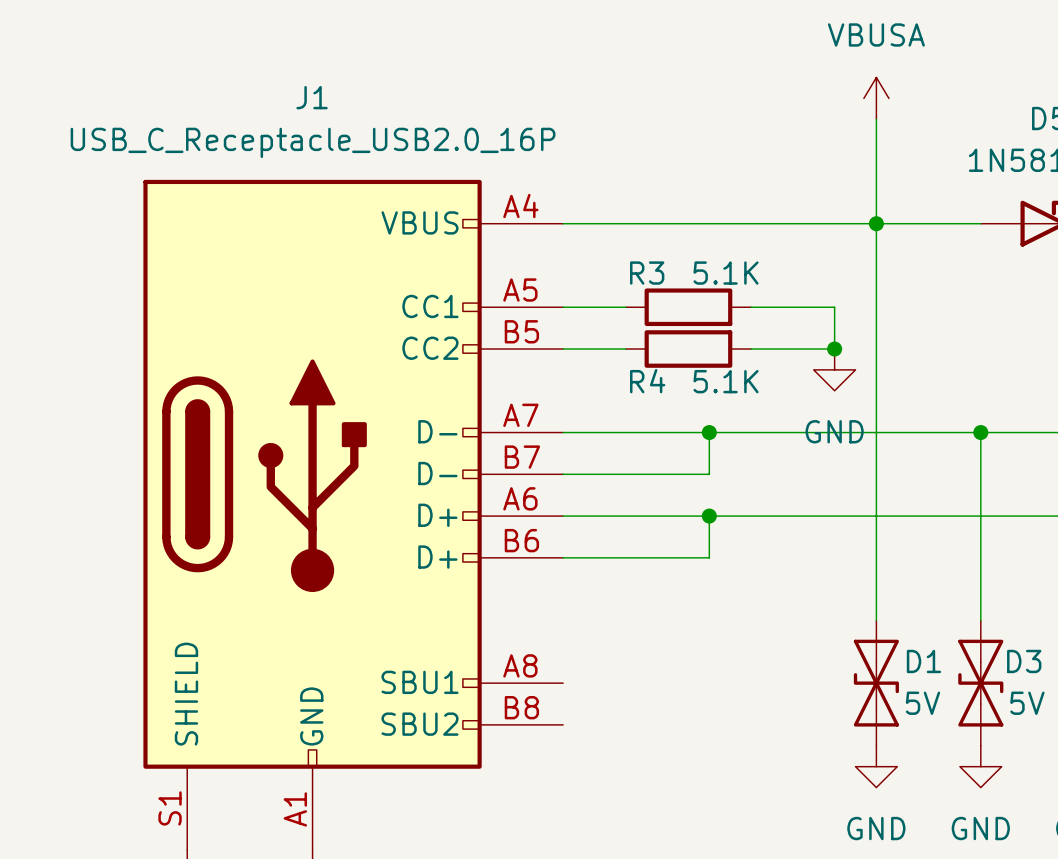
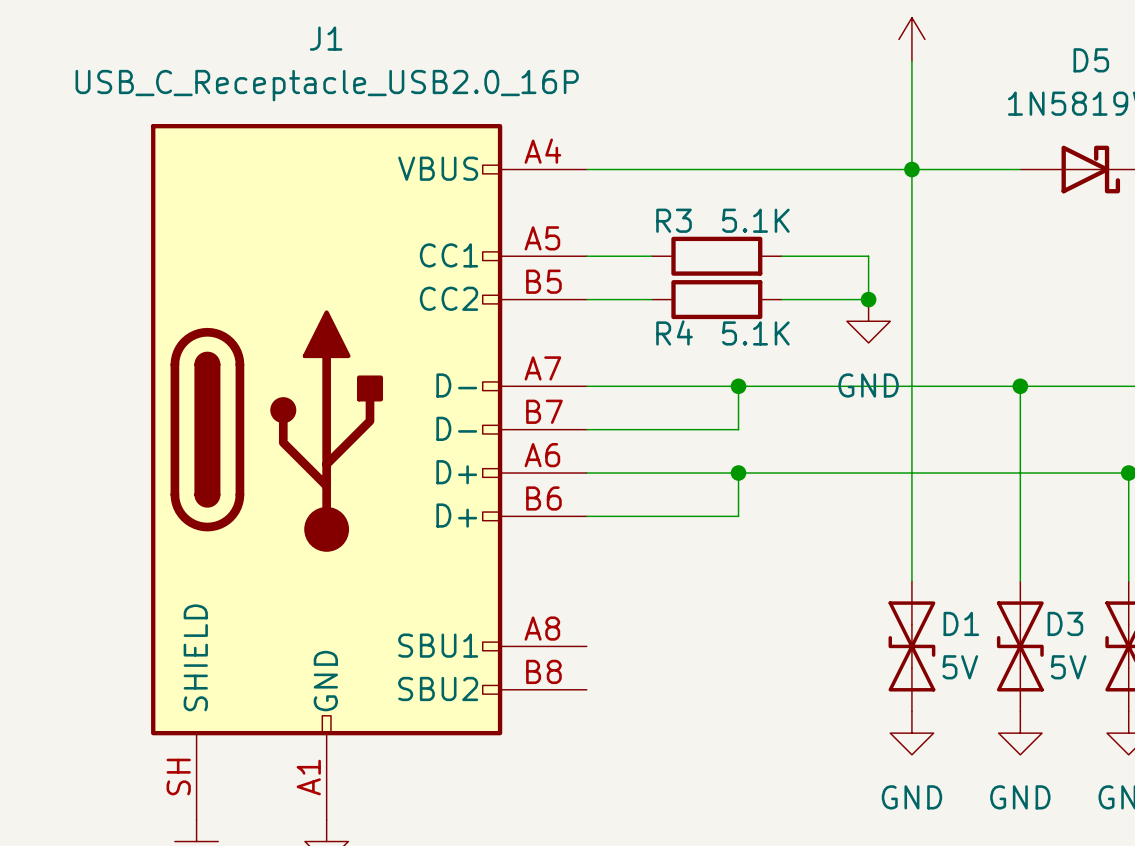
J1 pin number: S1 (170, 808) -> SH (178, 777)

